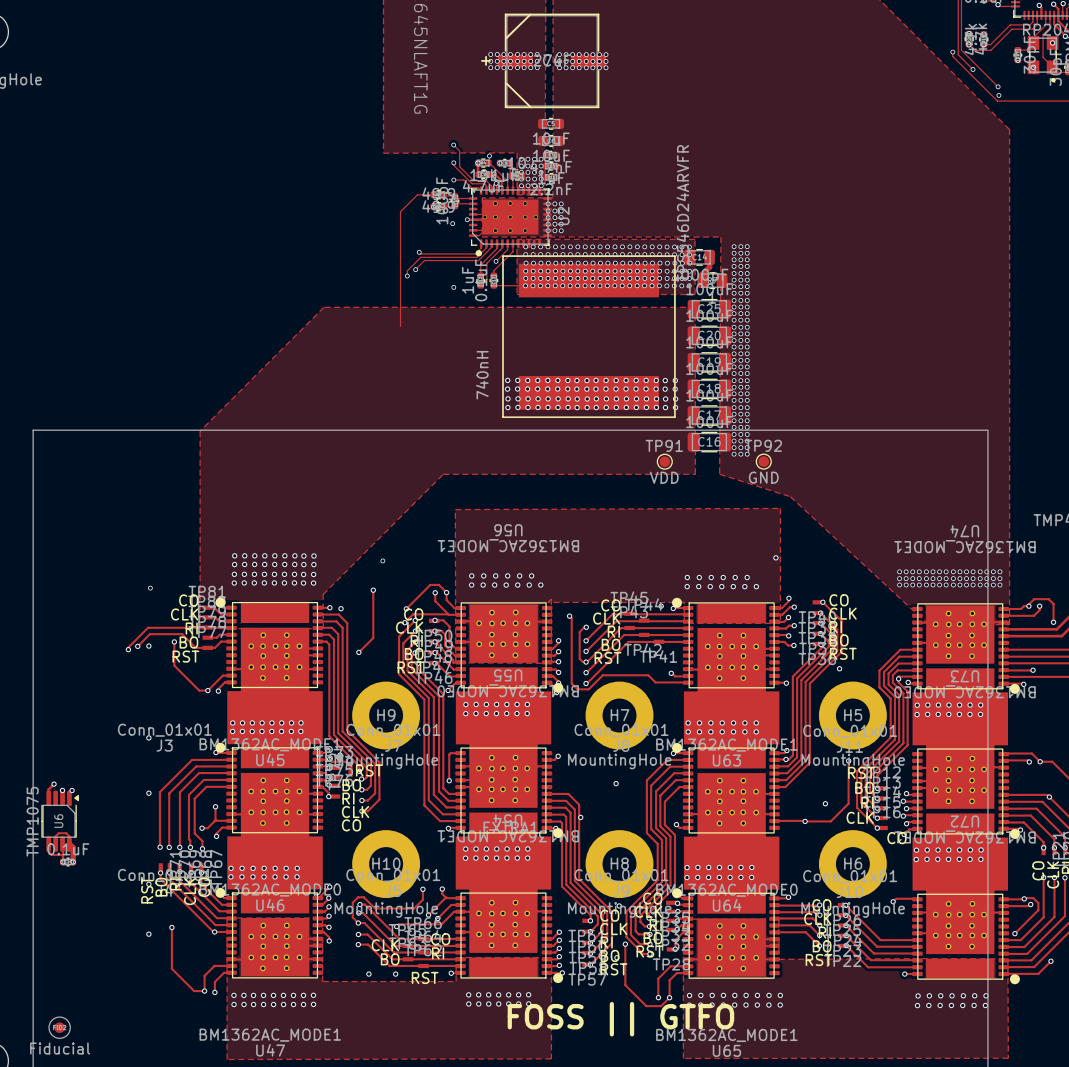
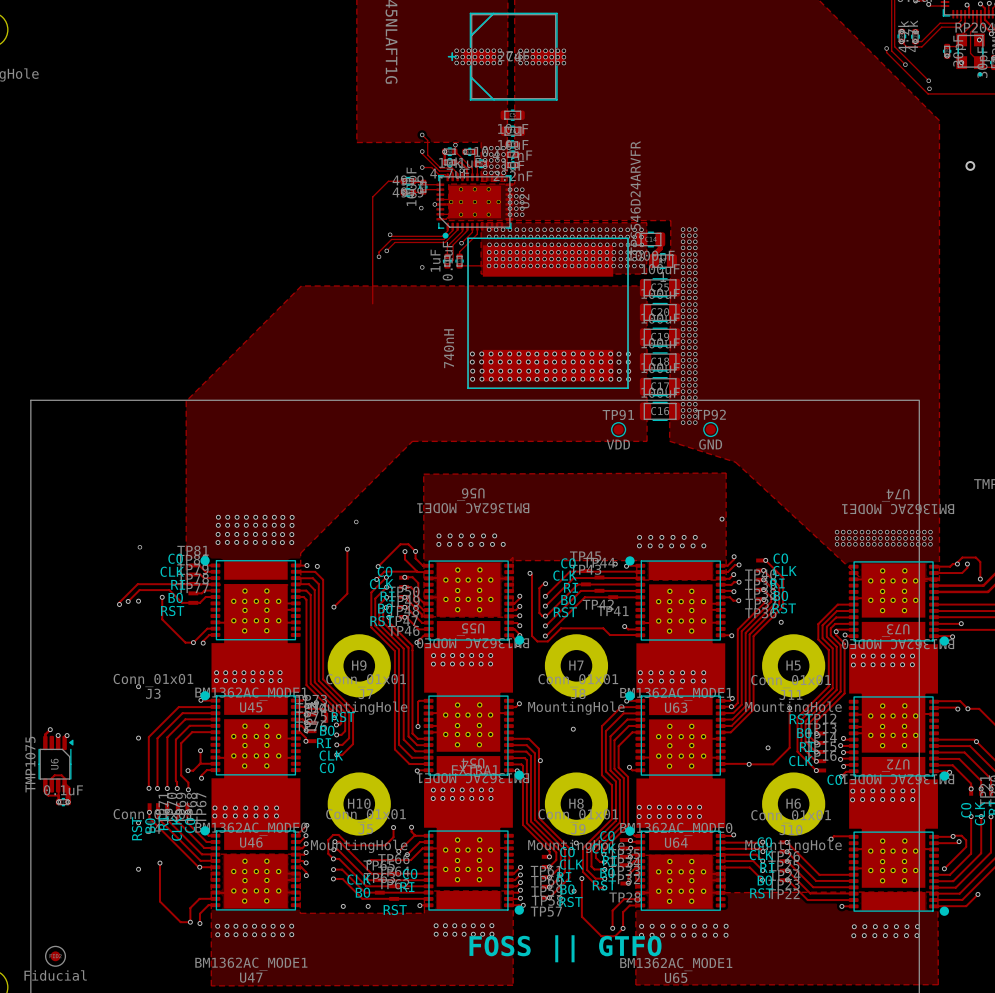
via: none -> (970, 165)

